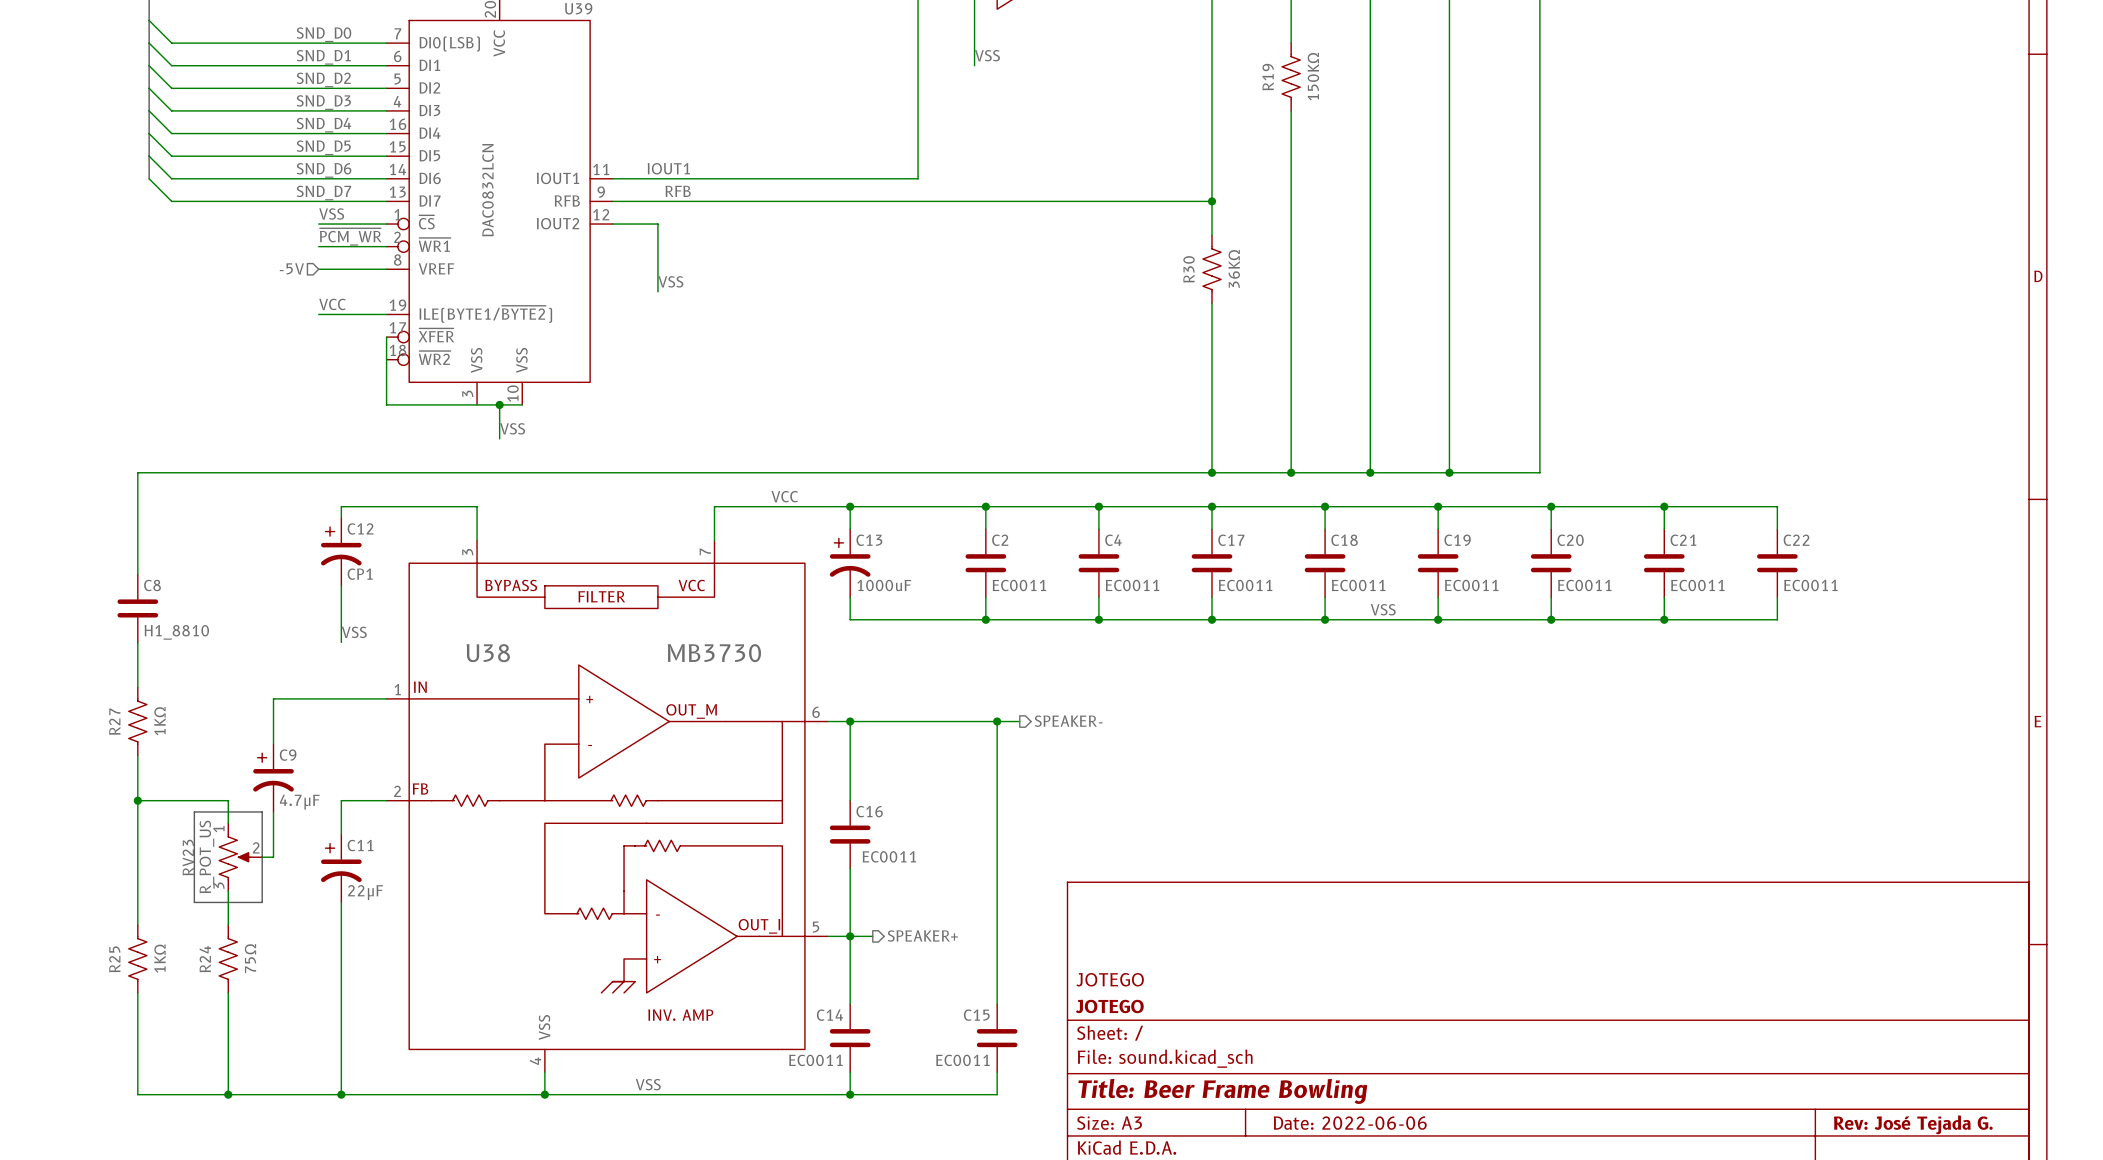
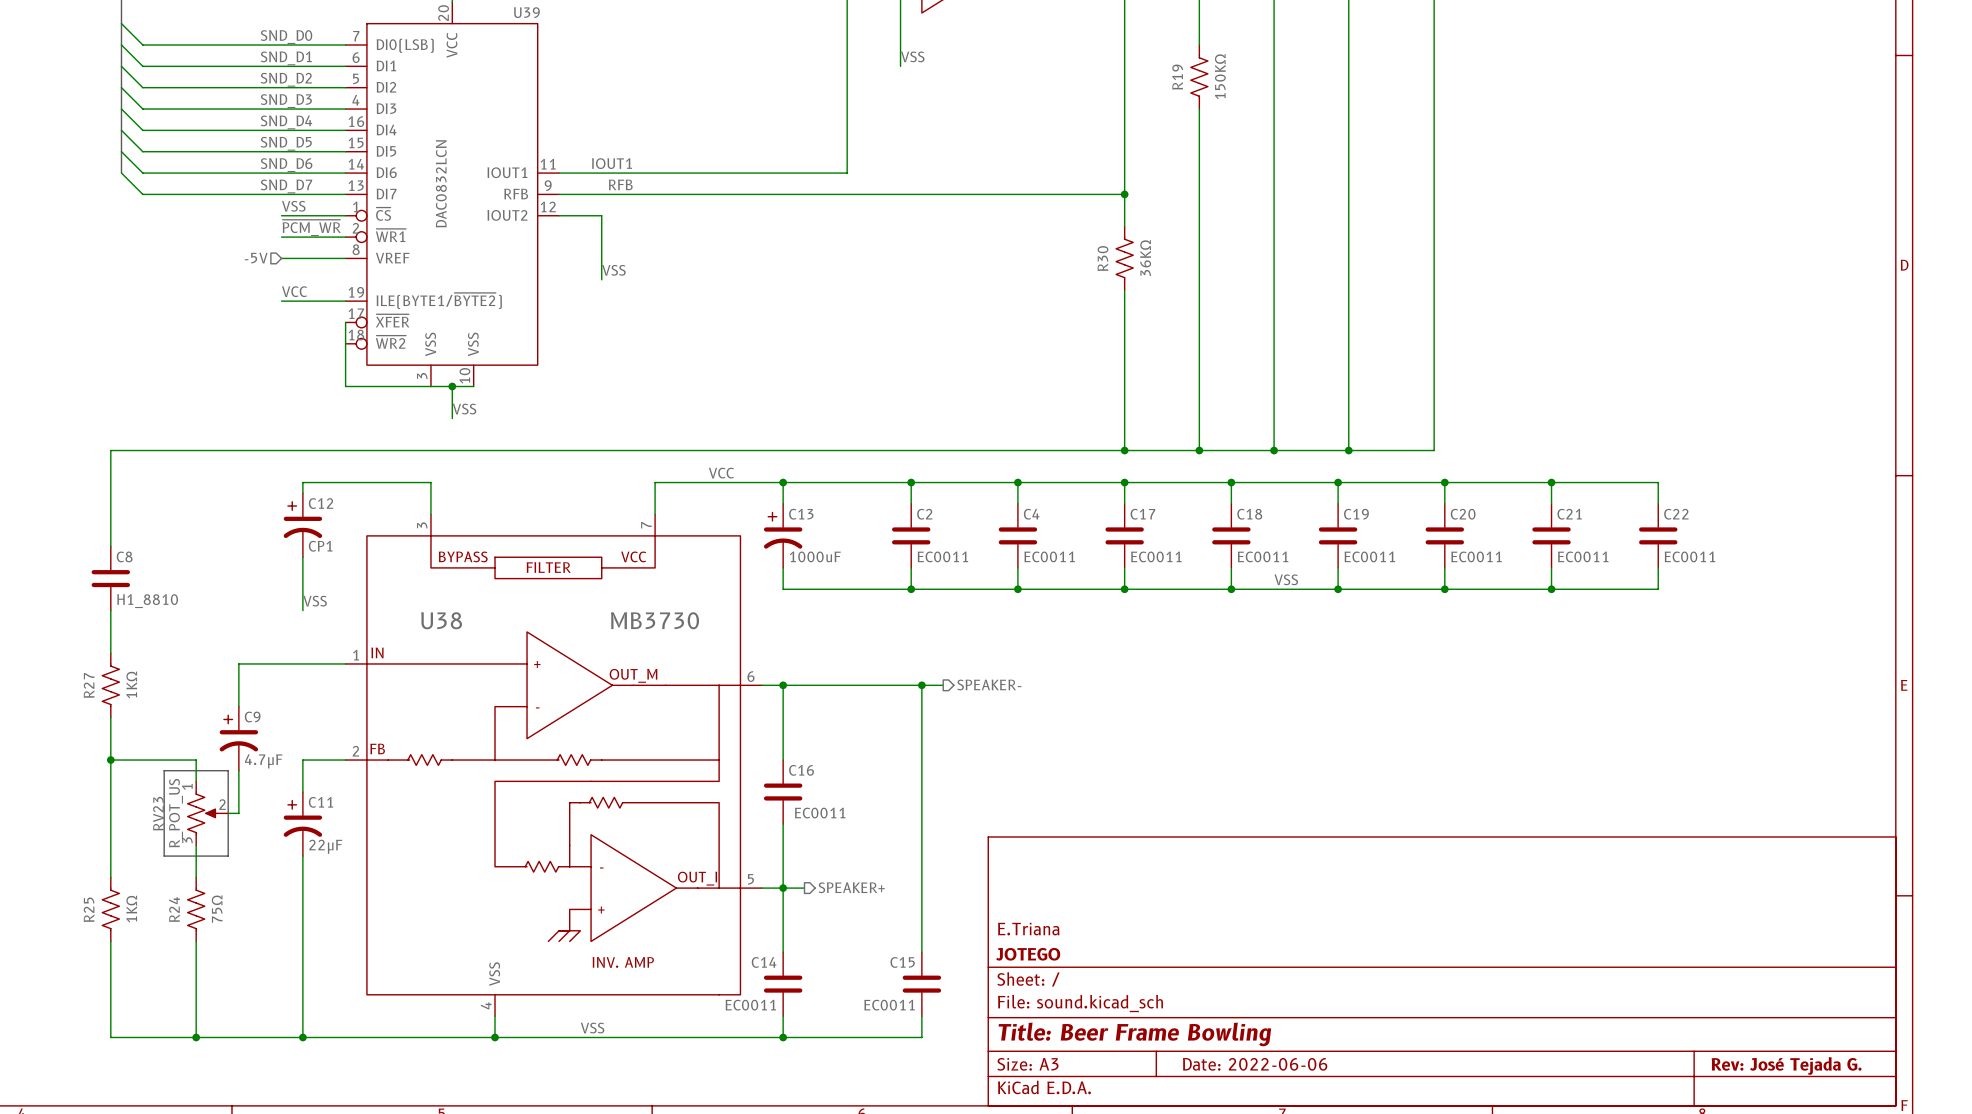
title block: JOTEGO (1110, 979) -> E.Triana (1028, 929)

